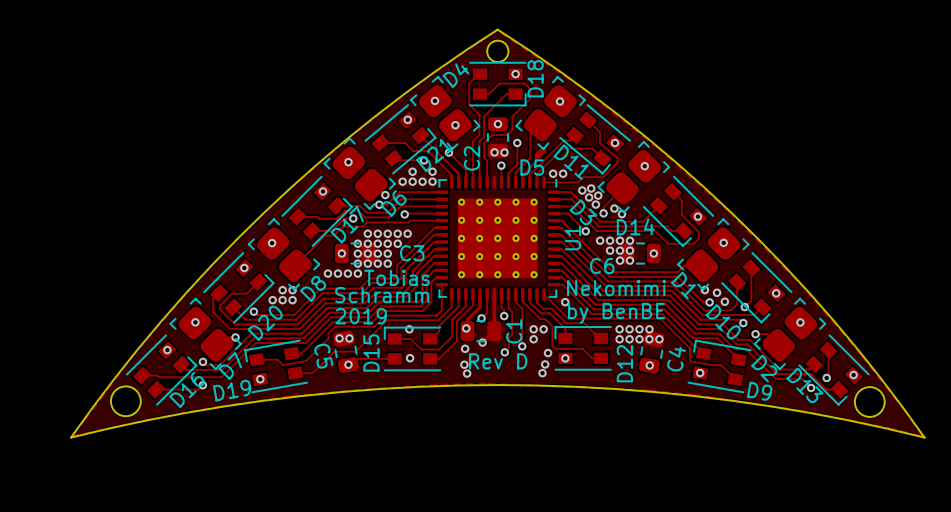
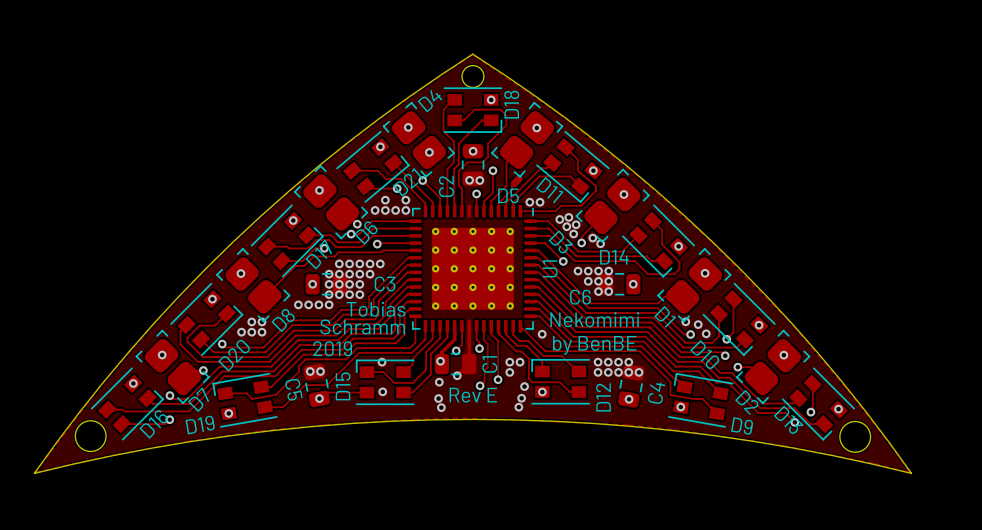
text: Rev D (498, 361) -> Rev E (473, 395)

